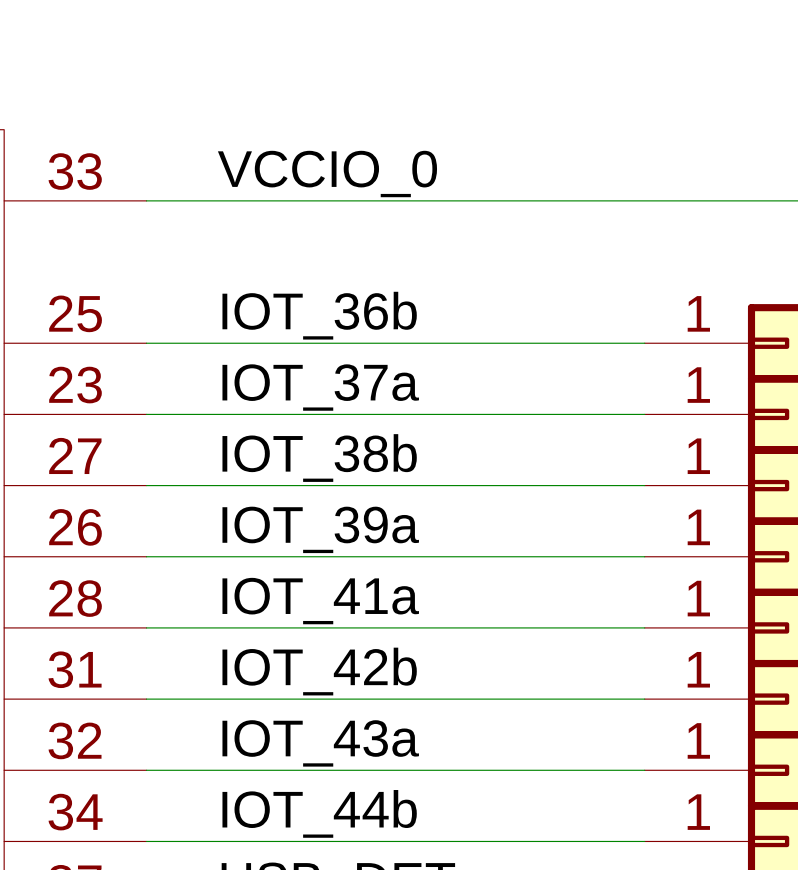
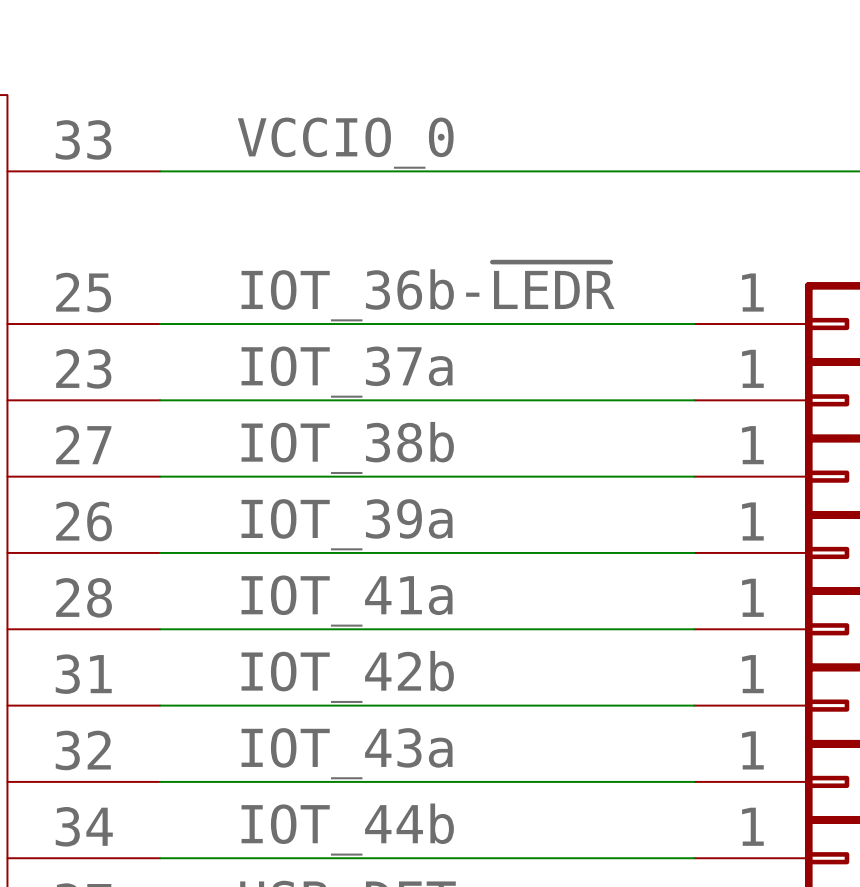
label: IOT_36b (319, 315) -> IOT_36b-~{LEDR} (428, 291)

